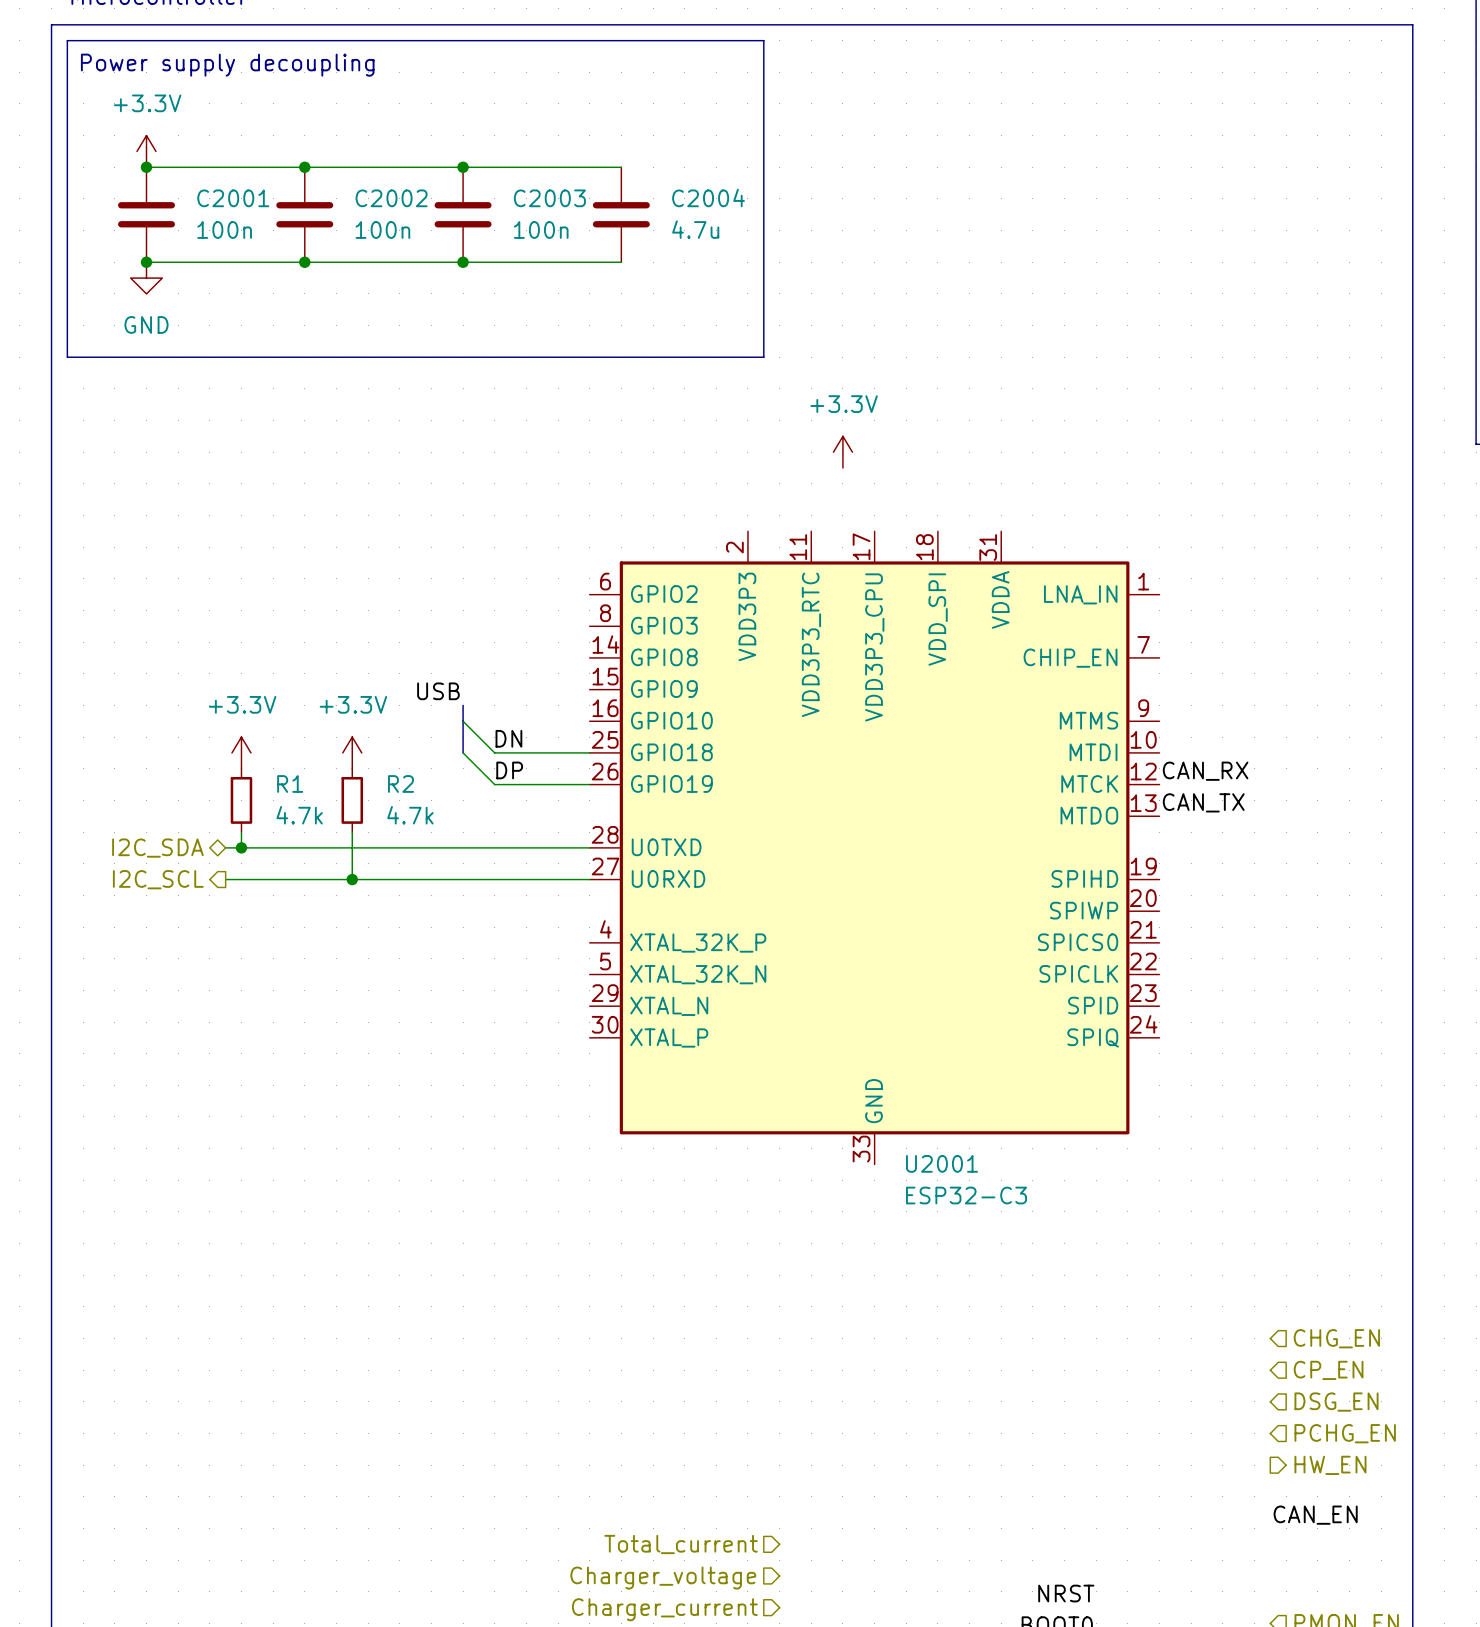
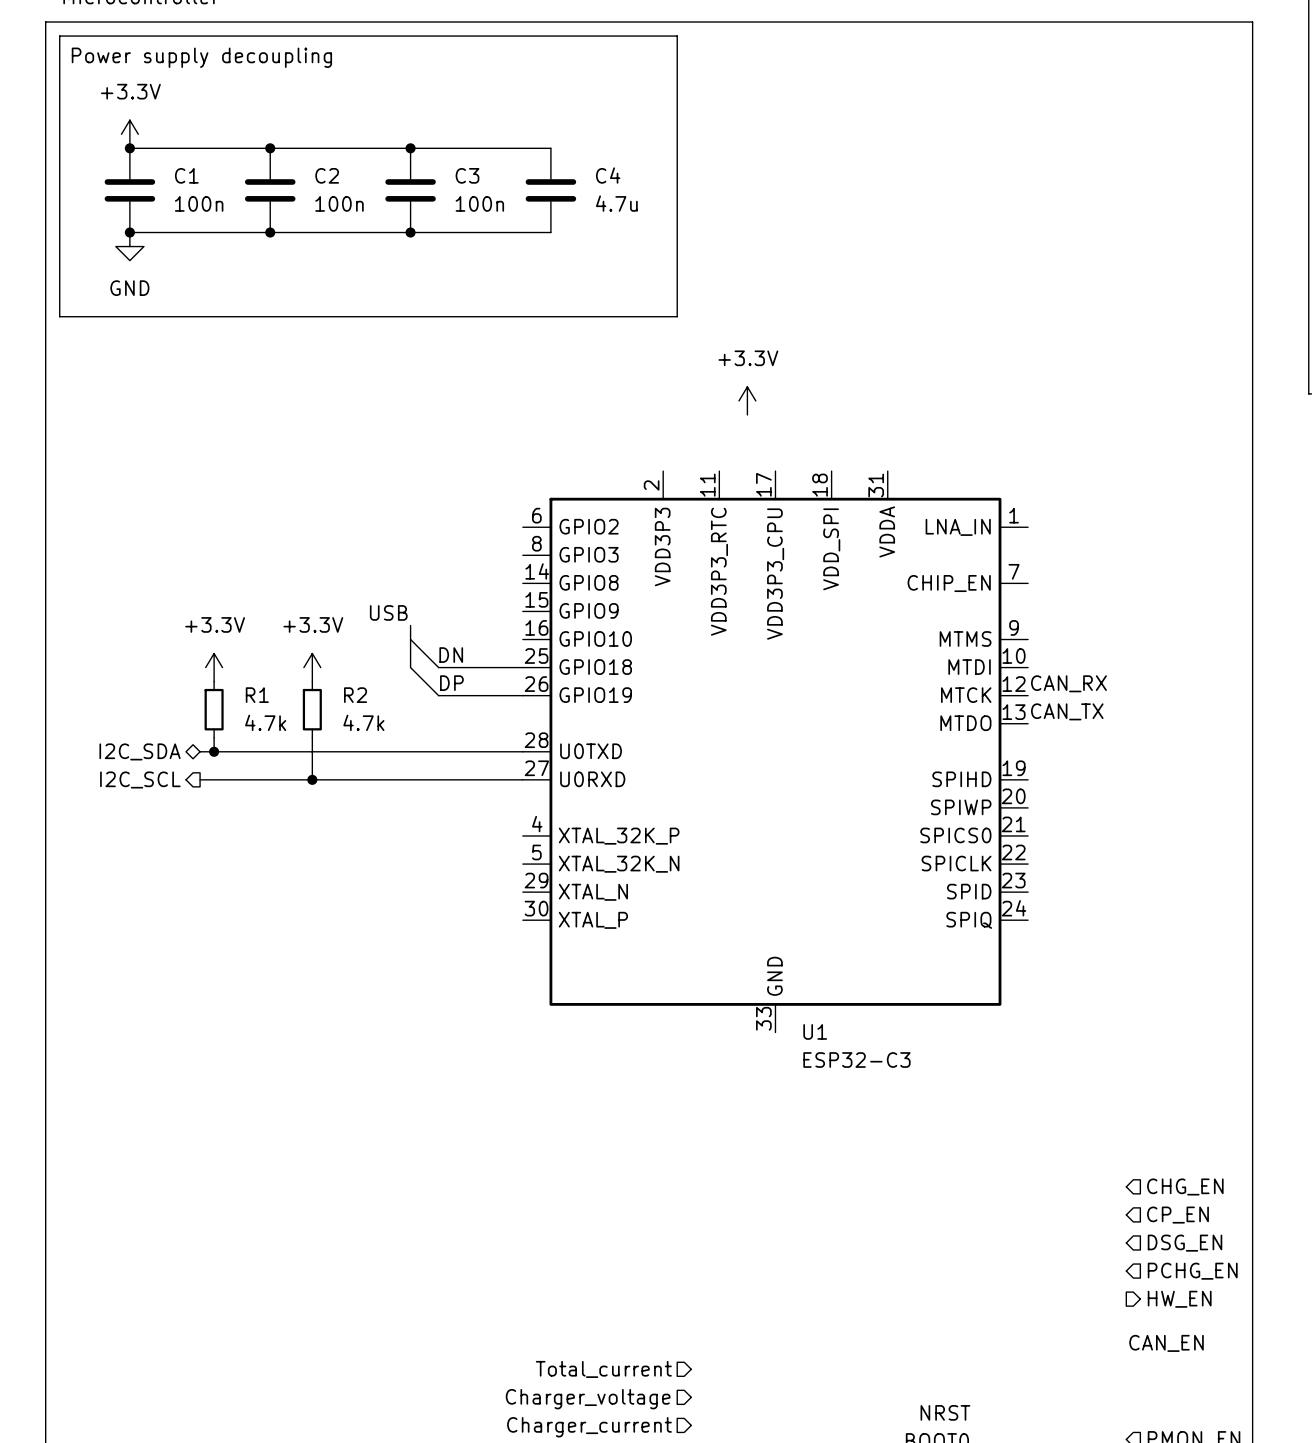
C2004 name: C2004 (708, 197) -> C4 (608, 175)
C2001 name: C2001 (233, 198) -> C1 (186, 175)
C2002 name: C2002 (391, 198) -> C2 (327, 175)
C2003 name: C2003 (549, 198) -> C3 (467, 175)
U2001 name: U2001 (942, 1163) -> U1 (815, 1031)

